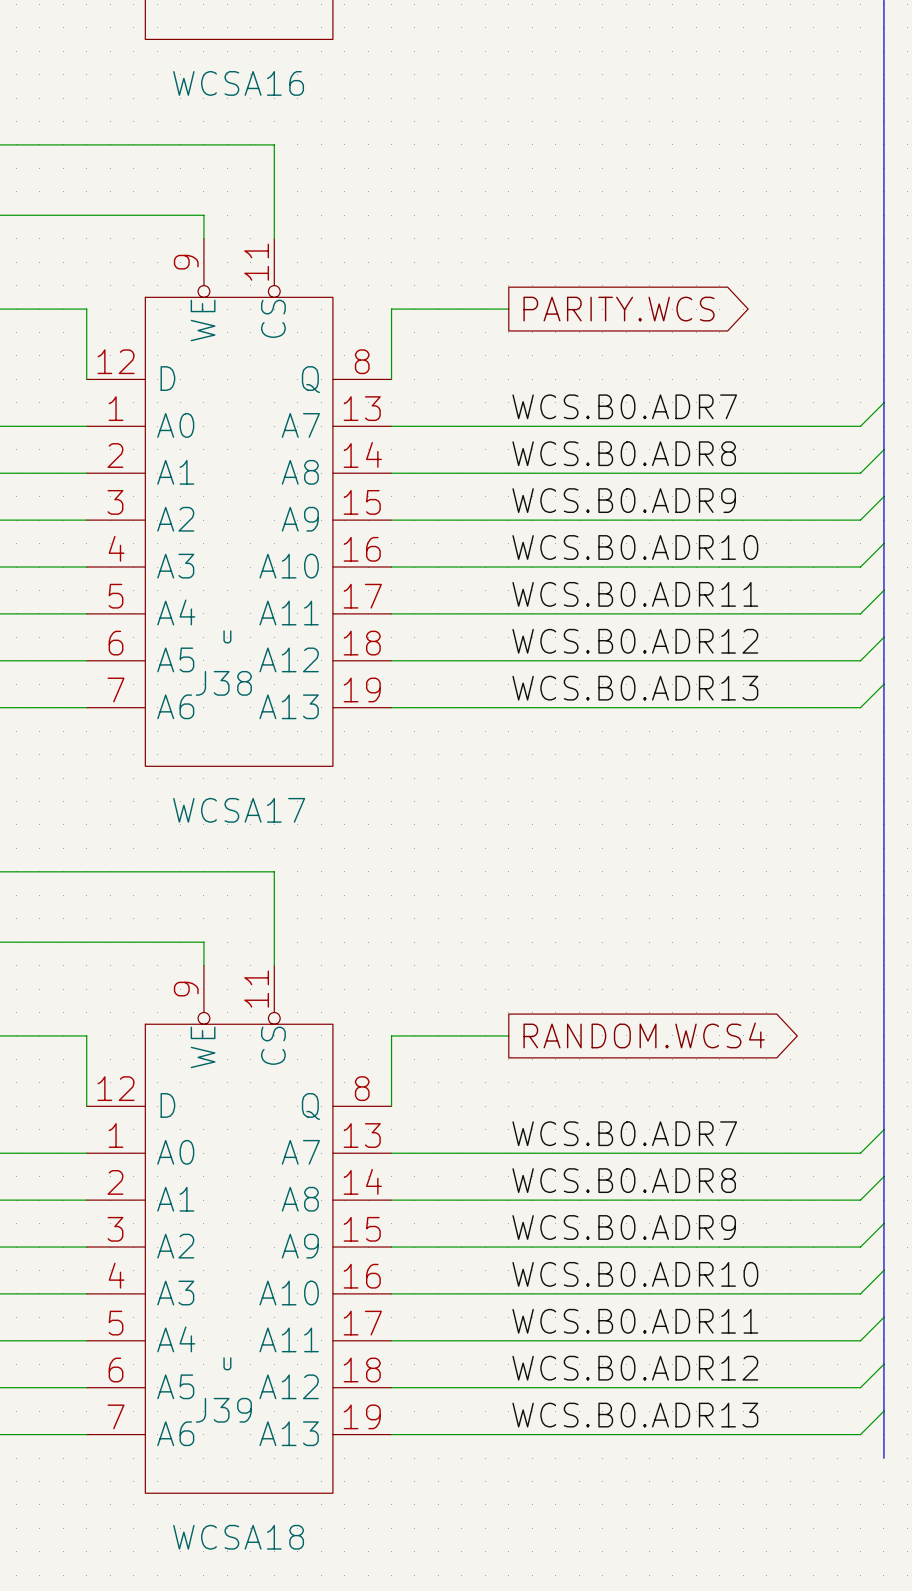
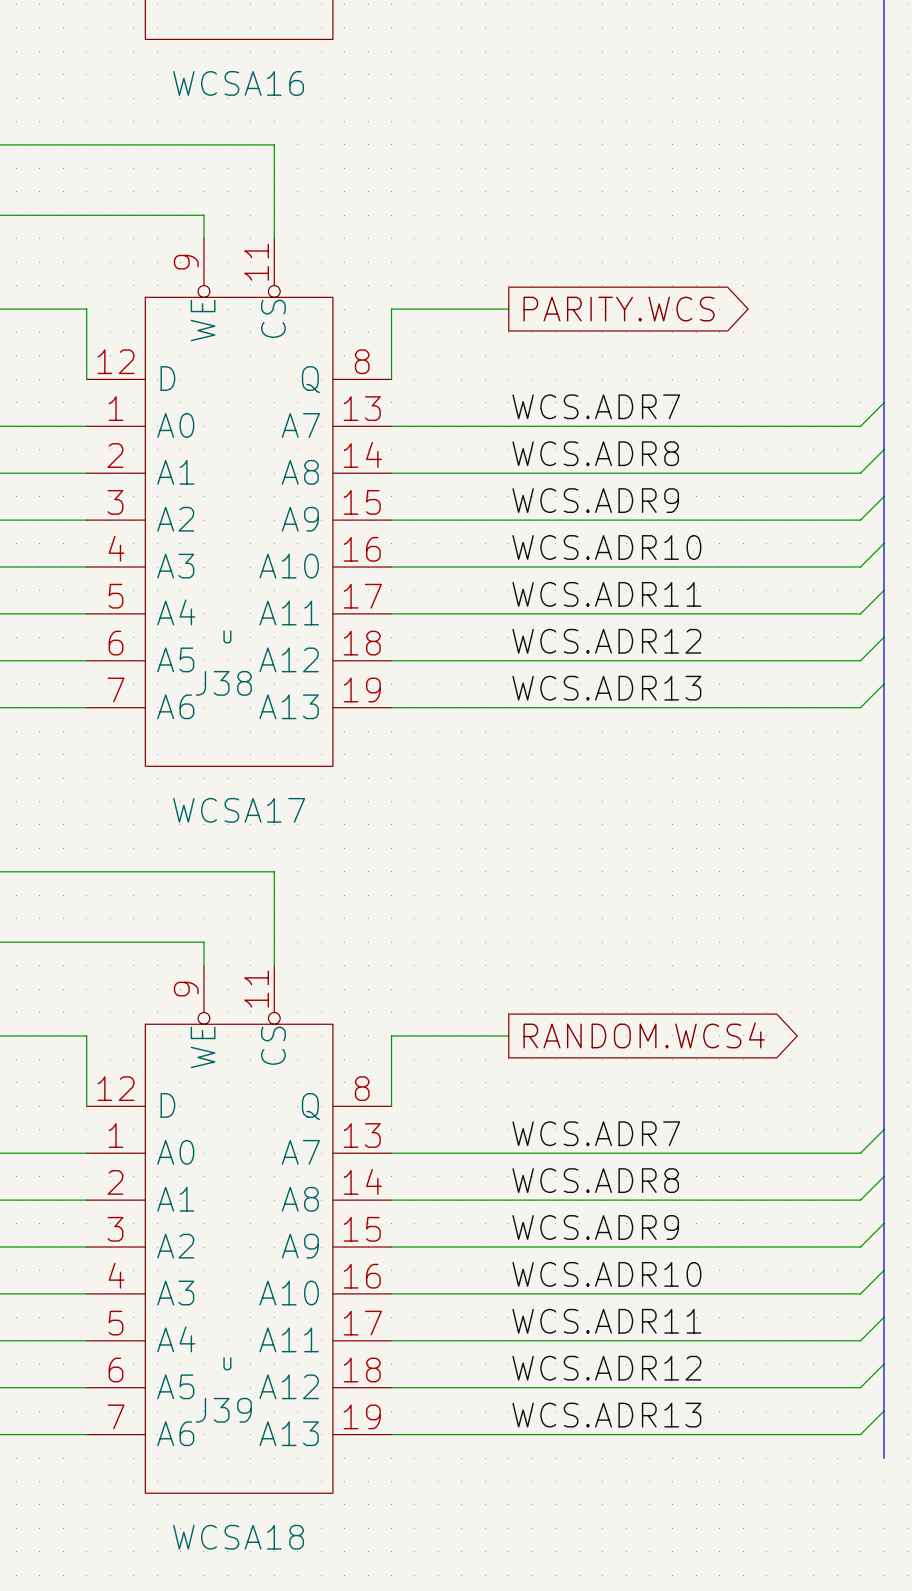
label: WCS.B0.ADR7 (624, 406) -> WCS.ADR7 (596, 406)
label: WCS.B0.ADR8 (624, 453) -> WCS.ADR8 (595, 453)
label: WCS.B0.ADR9 (624, 500) -> WCS.ADR9 (595, 500)
label: WCS.B0.ADR10 (635, 547) -> WCS.ADR10 (606, 547)
label: WCS.B0.ADR11 (635, 594) -> WCS.ADR11 (606, 594)
label: WCS.B0.ADR12 (635, 641) -> WCS.ADR12 (606, 641)
label: WCS.B0.ADR13 (635, 688) -> WCS.ADR13 (606, 688)
label: WCS.B0.ADR7 (624, 1133) -> WCS.ADR7 (596, 1133)
label: WCS.B0.ADR8 (624, 1180) -> WCS.ADR8 (595, 1180)
label: WCS.B0.ADR9 (624, 1227) -> WCS.ADR9 (595, 1227)
label: WCS.B0.ADR10 (635, 1274) -> WCS.ADR10 (606, 1274)
label: WCS.B0.ADR11 (635, 1321) -> WCS.ADR11 (606, 1321)
label: WCS.B0.ADR12 (635, 1368) -> WCS.ADR12 (606, 1368)
label: WCS.B0.ADR13 (635, 1415) -> WCS.ADR13 (606, 1415)

